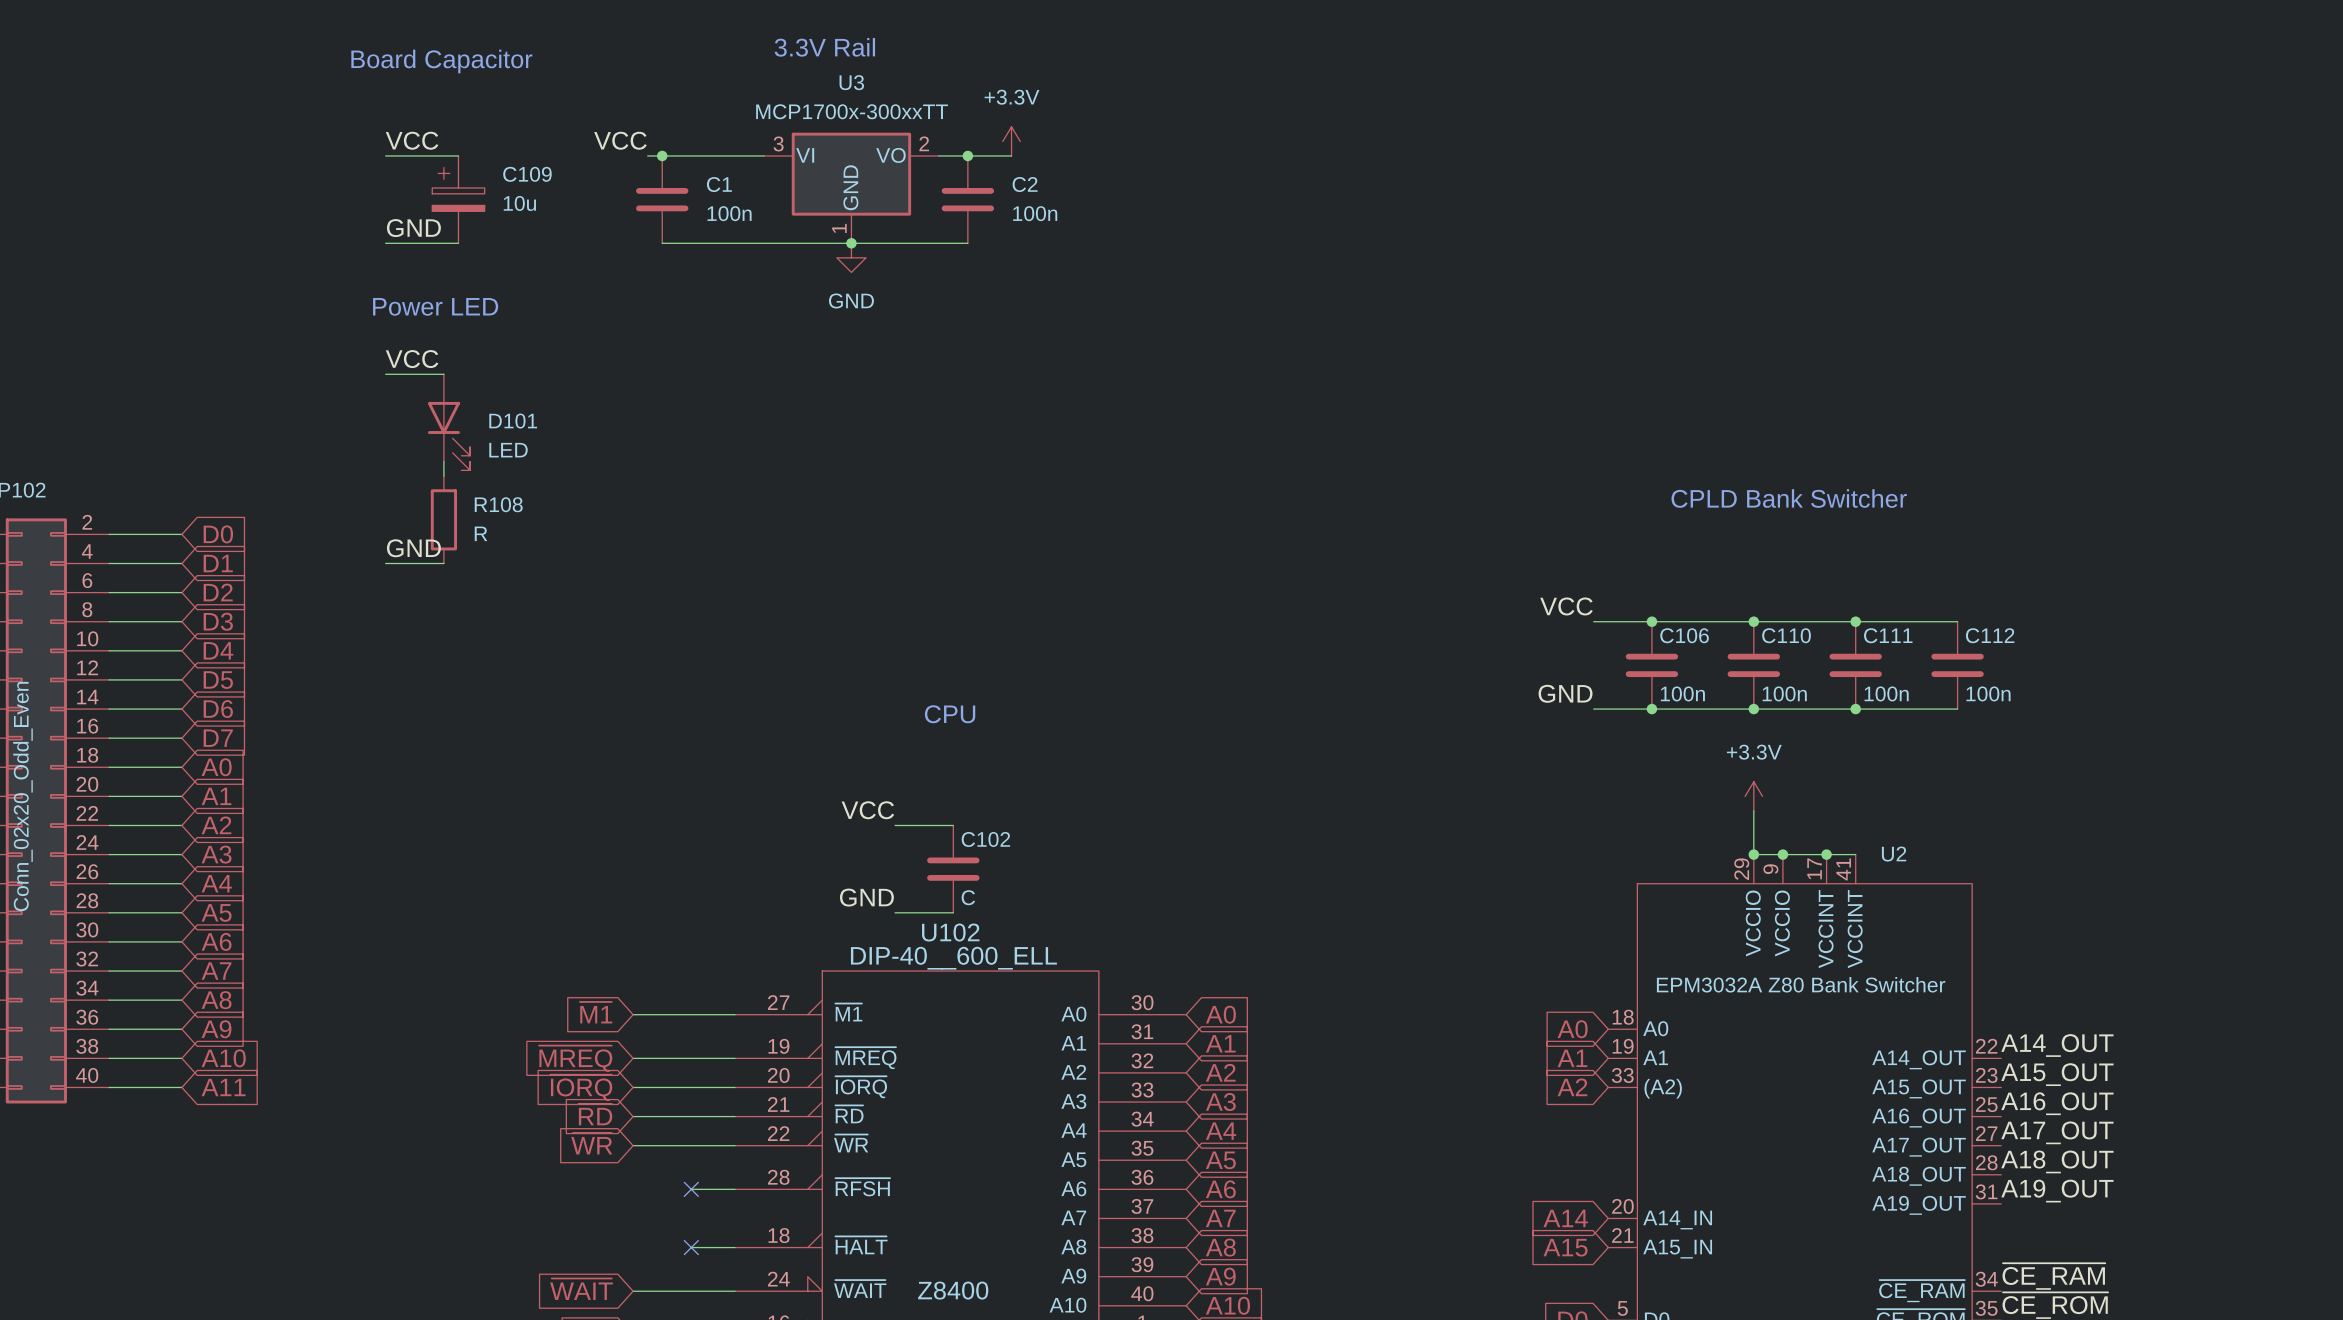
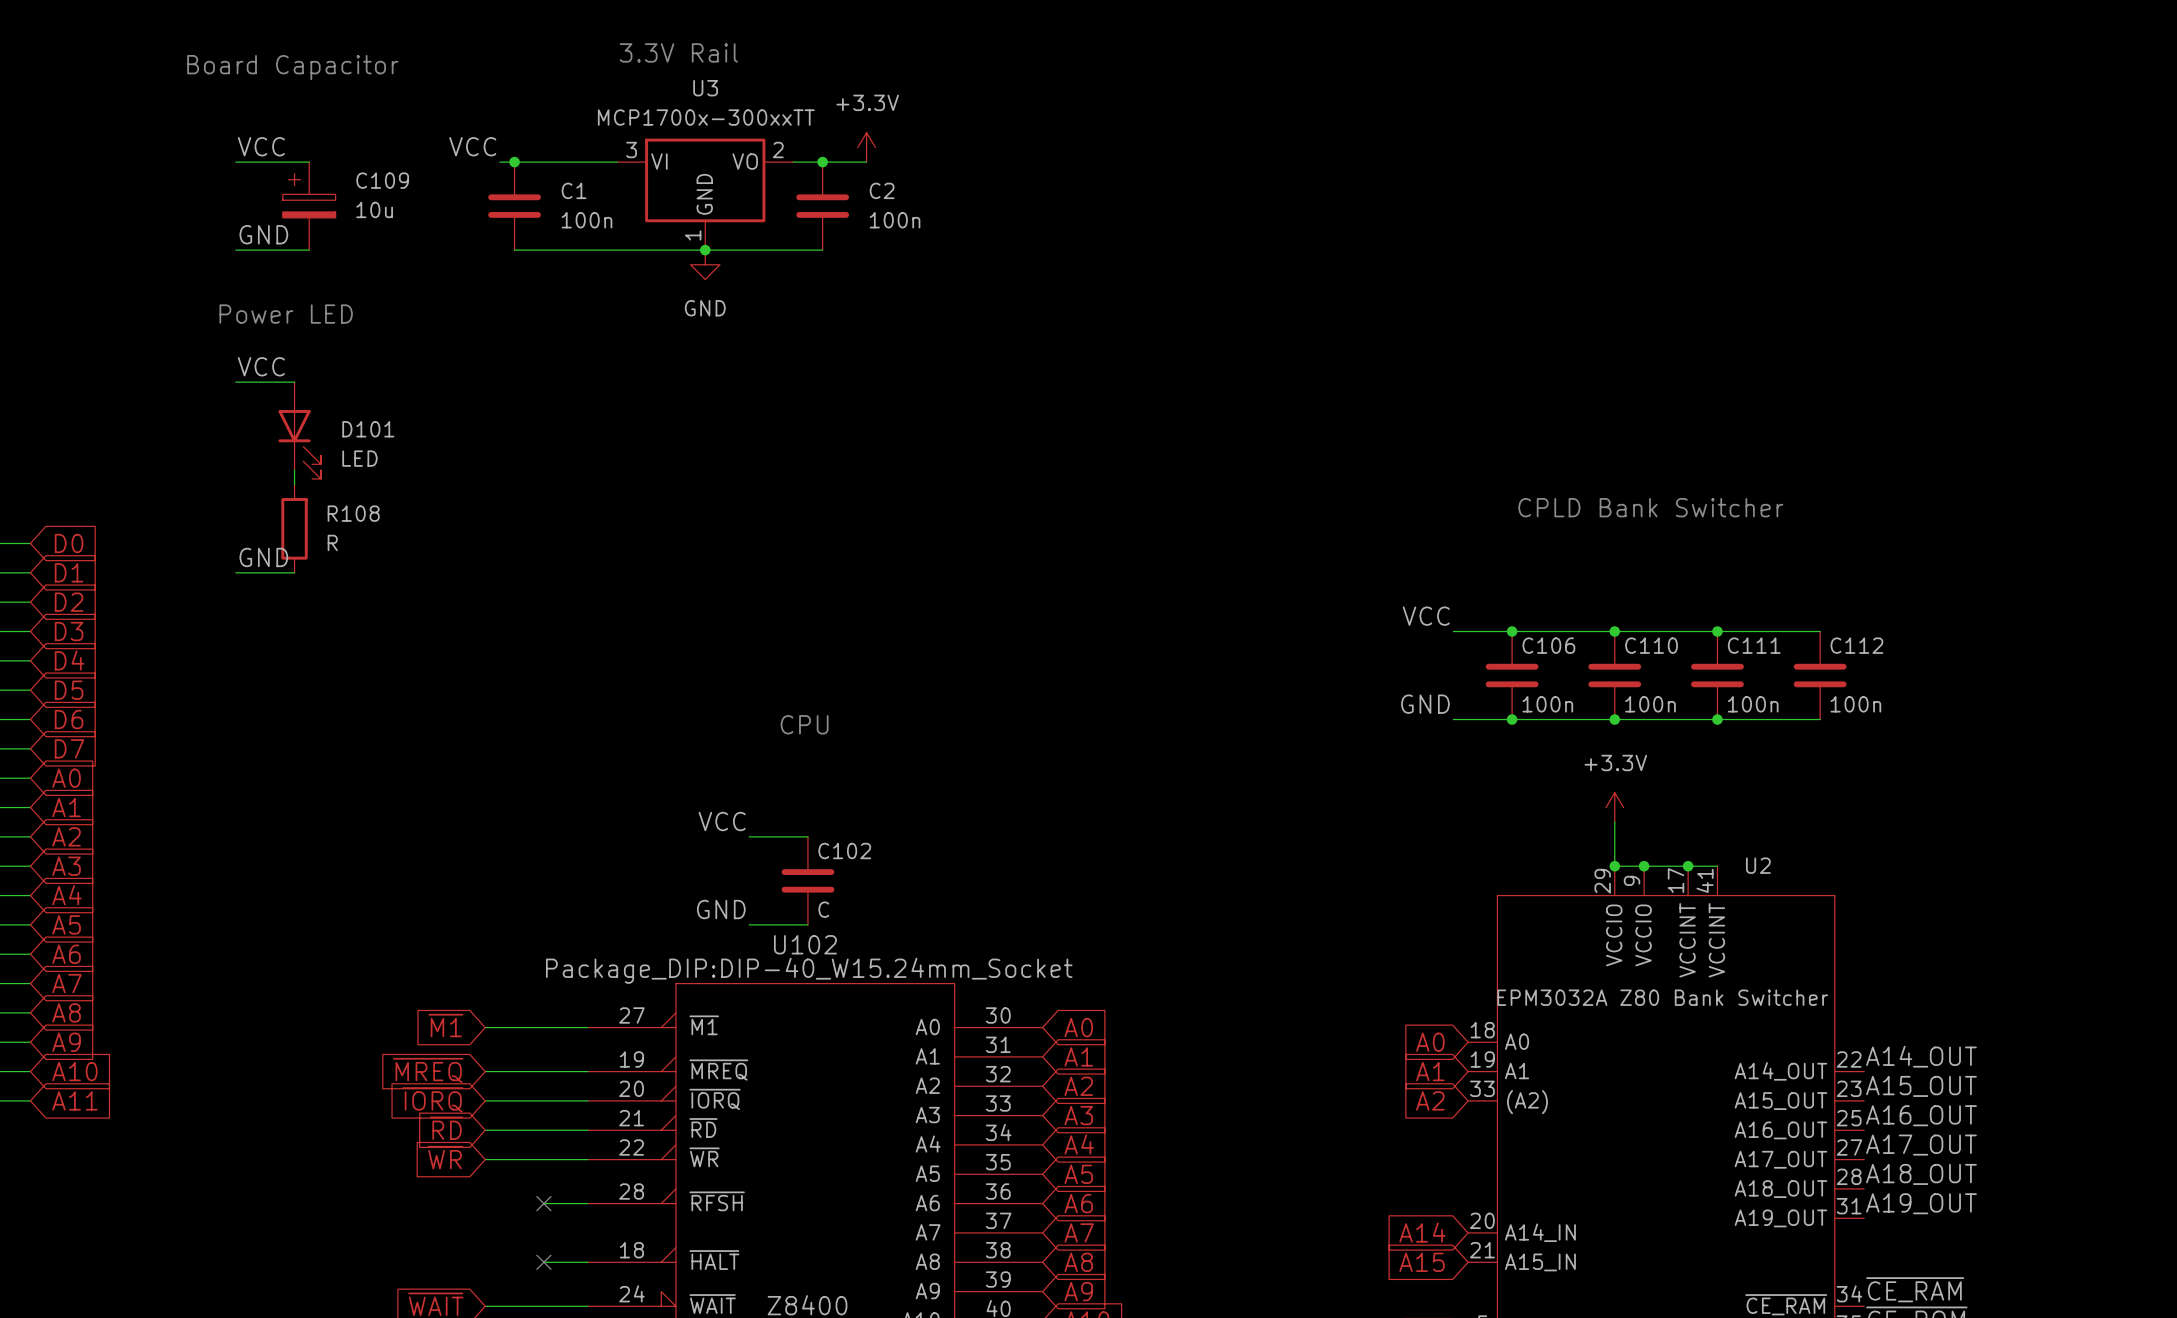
U102 text: DIP-40__600_ELL (953, 958) -> Package_DIP:DIP-40_W15.24mm_Socket (809, 970)

